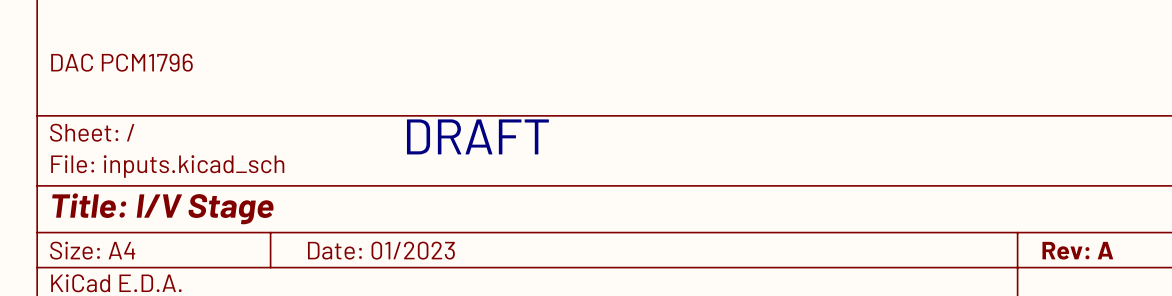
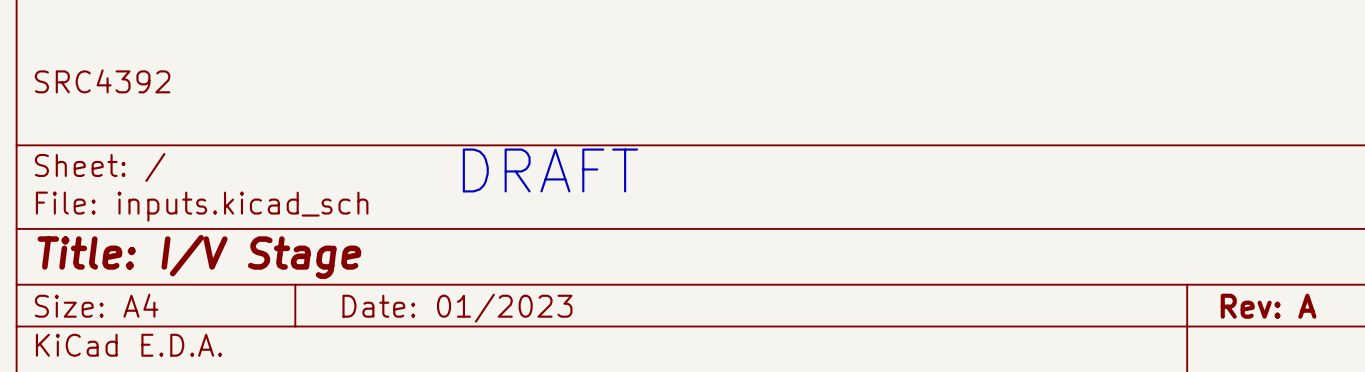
title block: DAC PCM1796 (121, 62) -> SRC4392 (102, 81)

